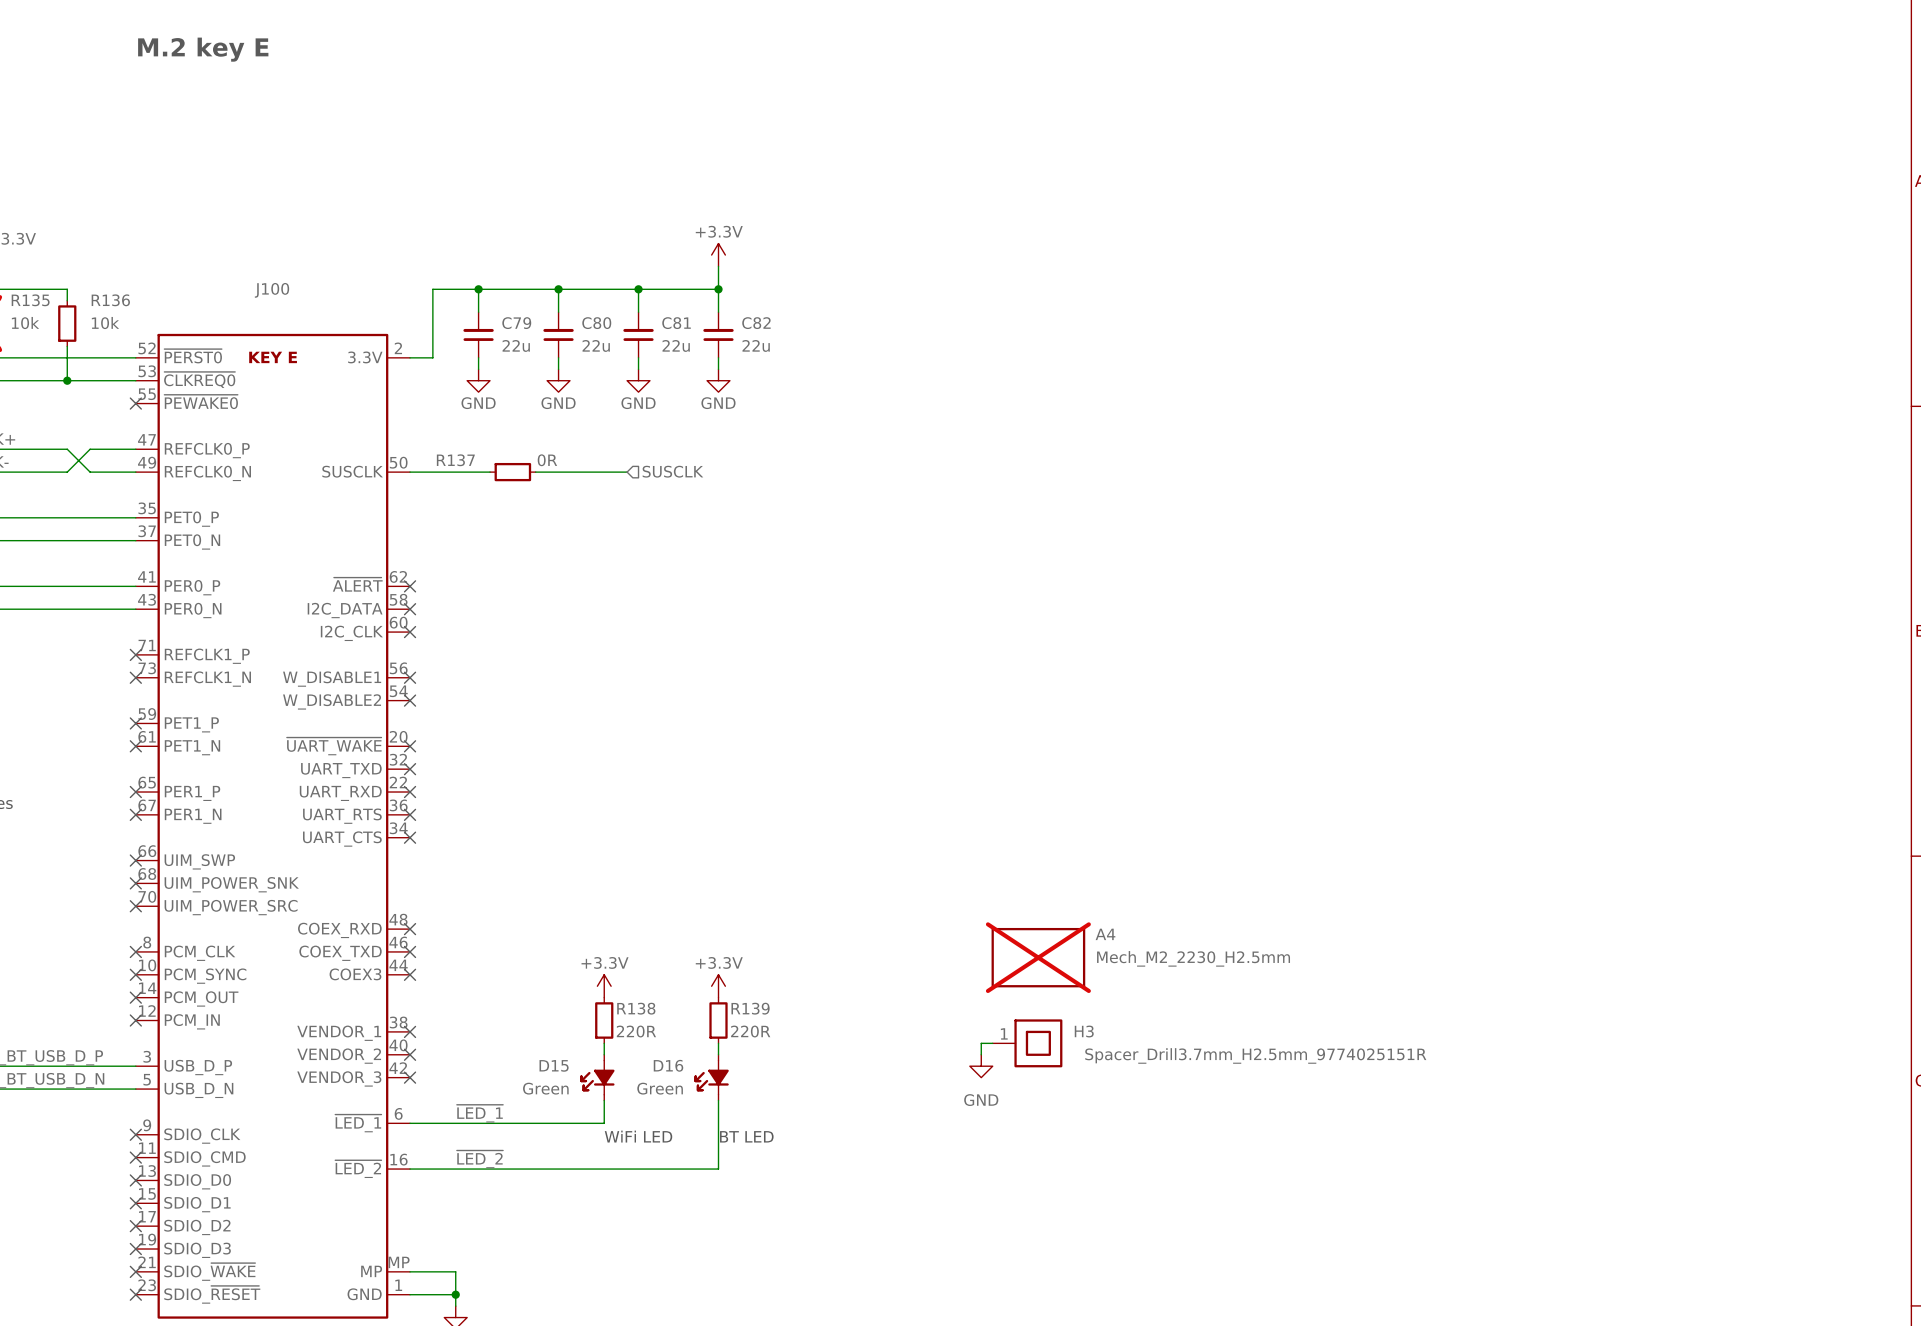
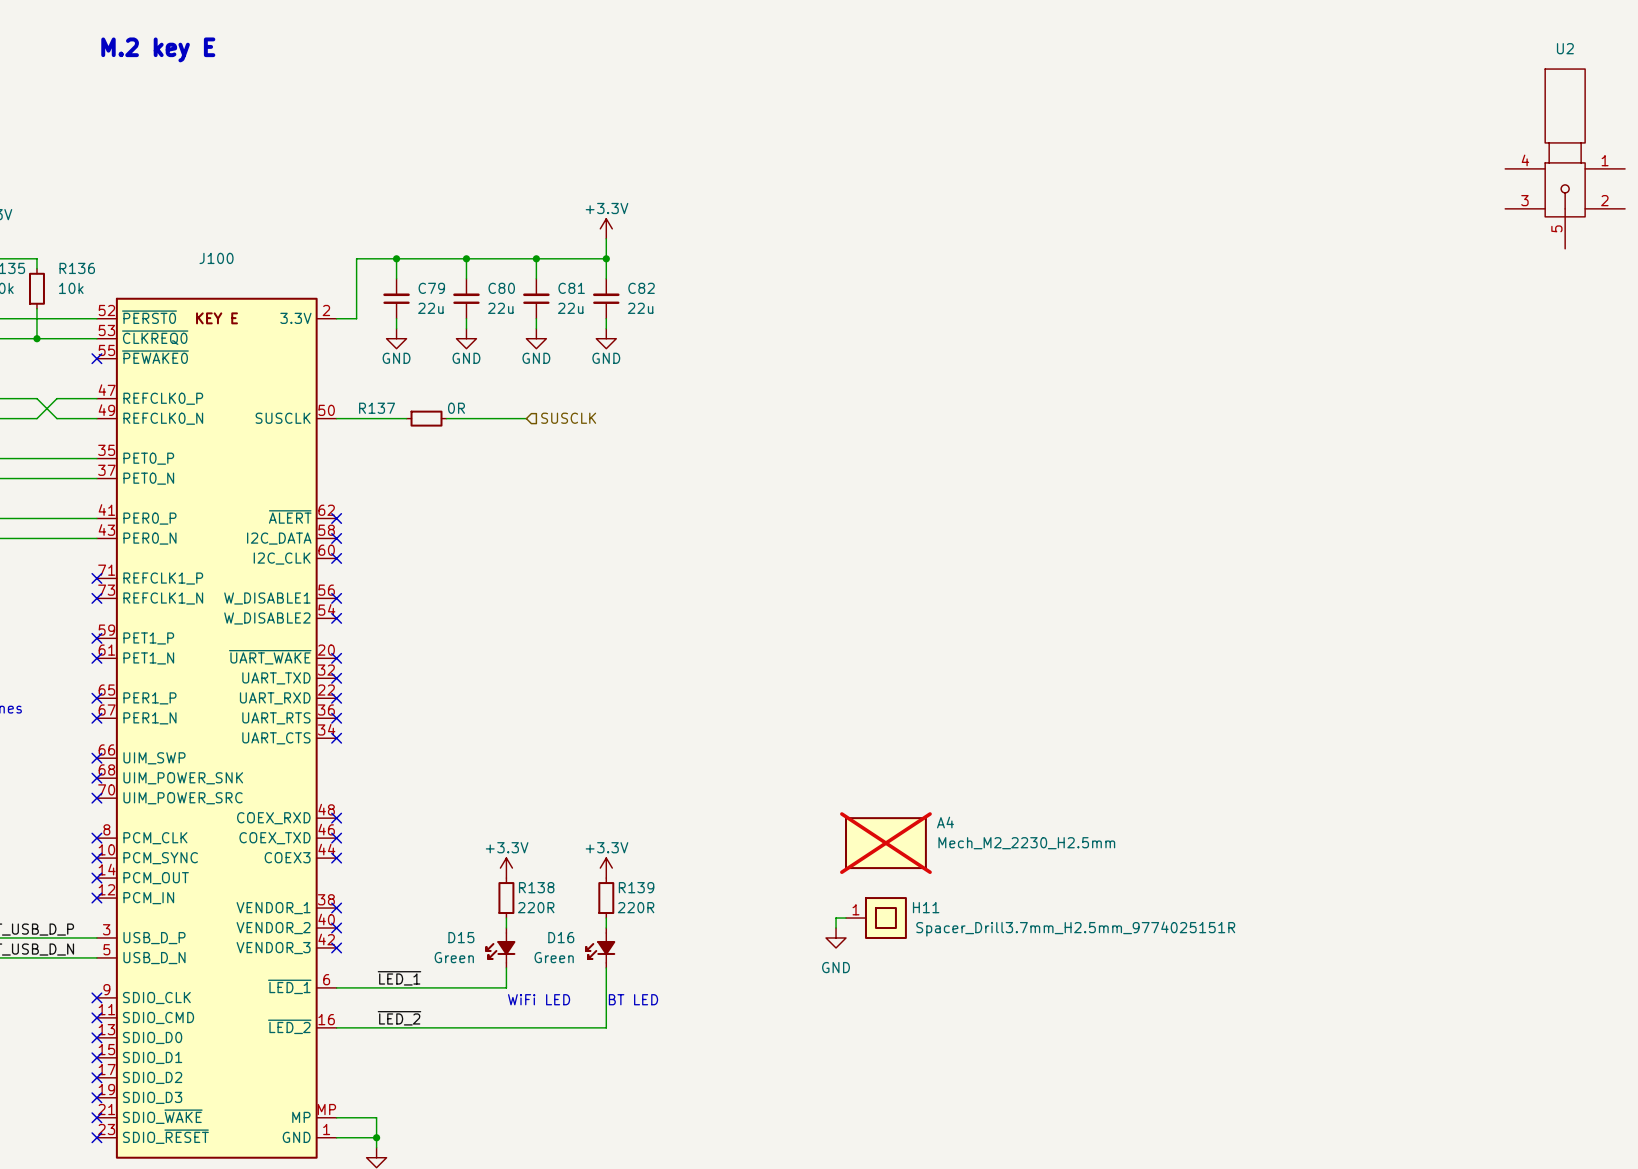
U2: none -> (1565, 158)
H3 name: H3 (1084, 1031) -> H11 (926, 907)

